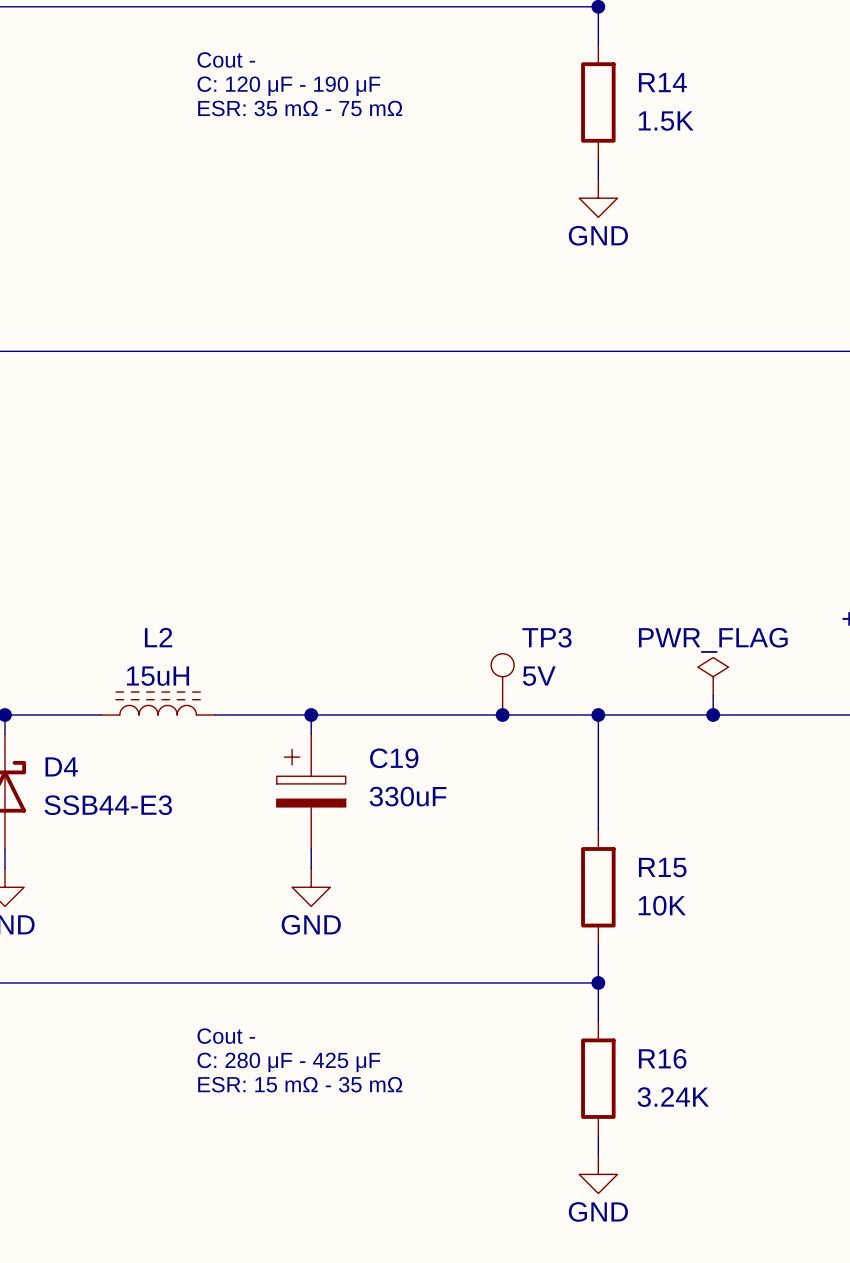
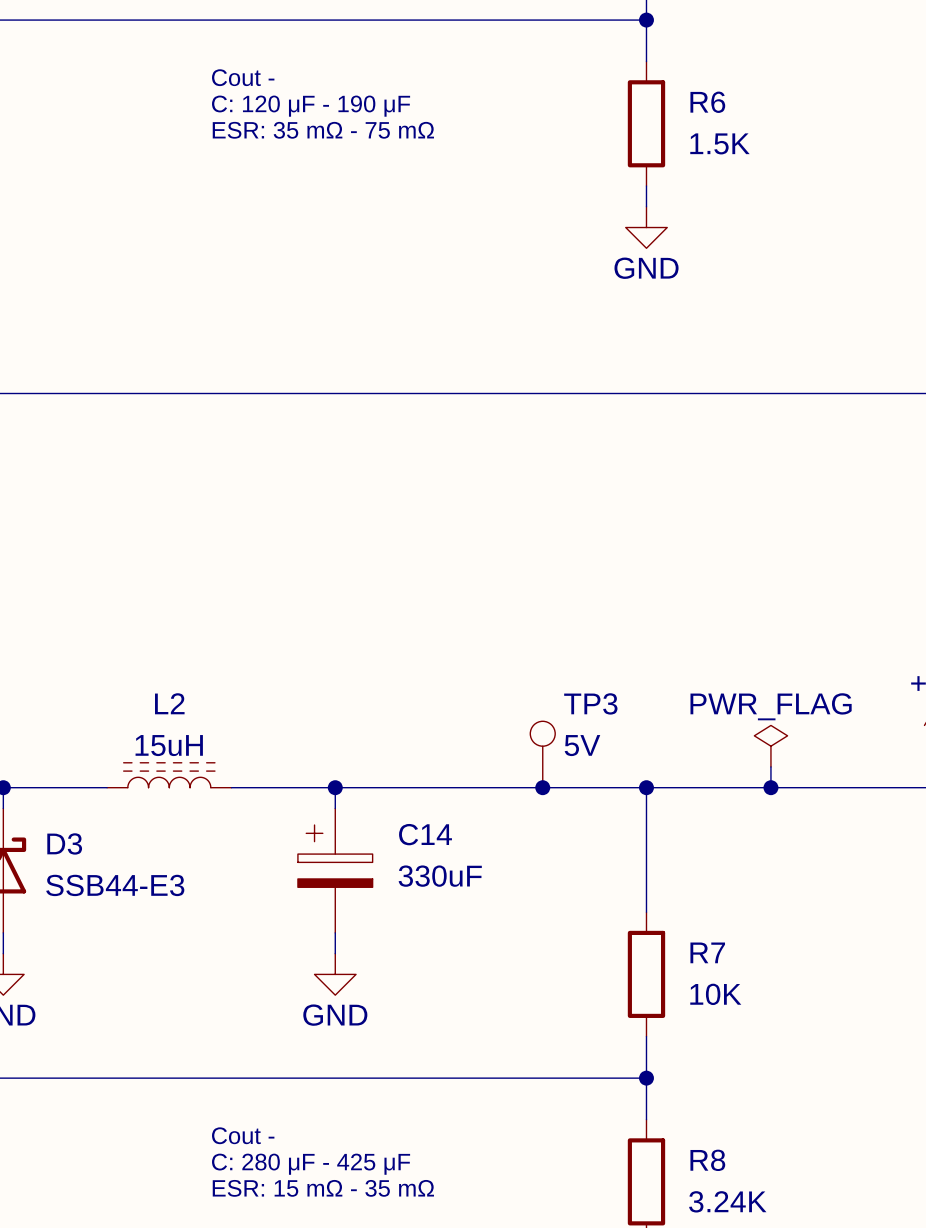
R14 name: R14 (662, 82) -> R6 (707, 102)
C19 name: C19 (394, 758) -> C14 (425, 834)
D4 name: D4 (61, 766) -> D3 (64, 843)
R15 name: R15 (662, 867) -> R7 (707, 952)
R16 name: R16 (662, 1058) -> R8 (707, 1160)

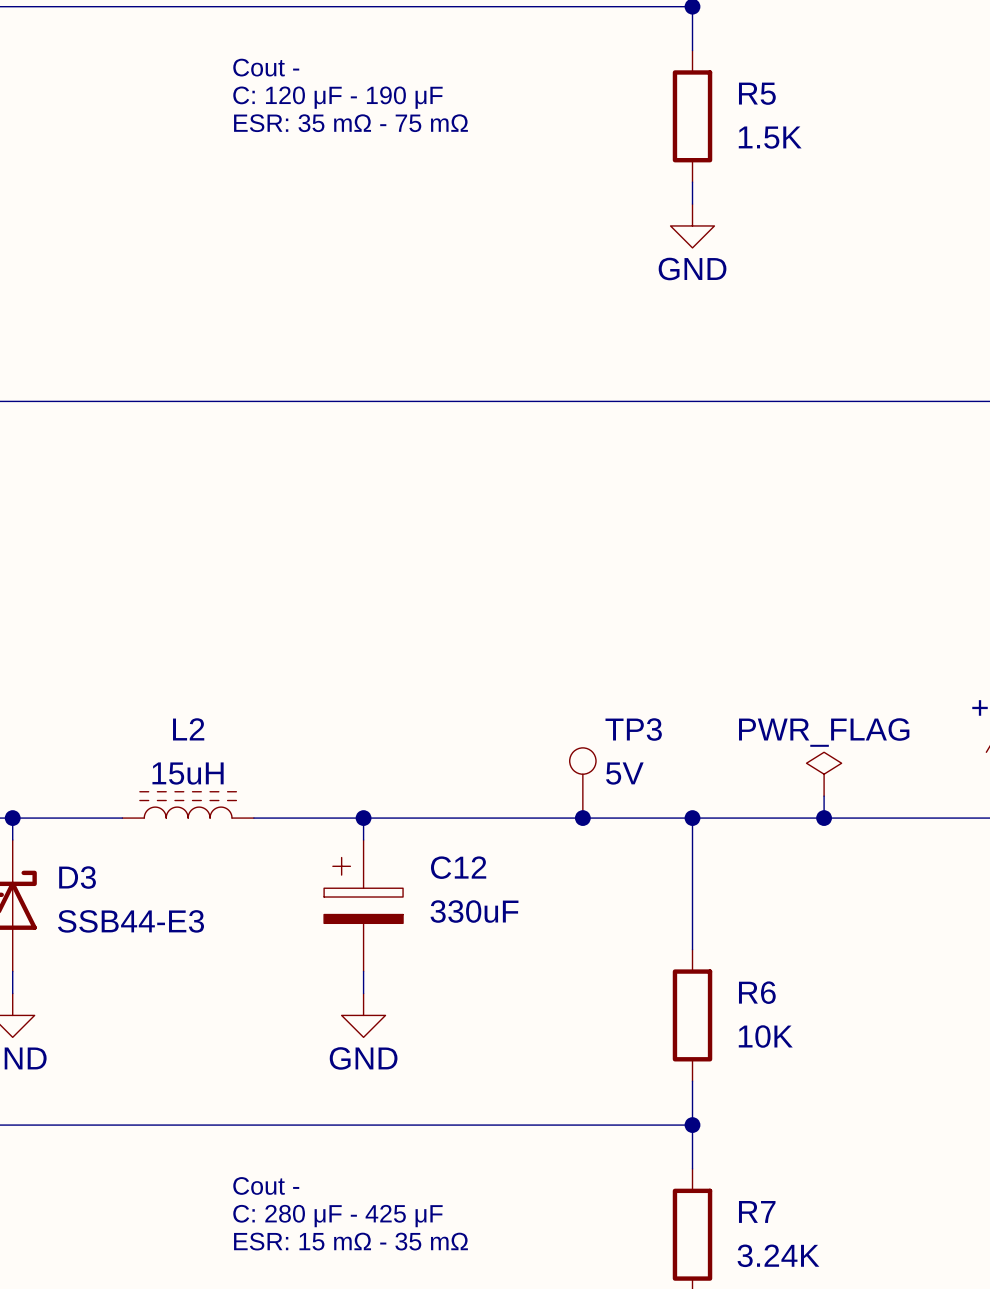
R6 name: R6 (707, 102) -> R5 (757, 93)
C14 name: C14 (425, 834) -> C12 (458, 867)
R7 name: R7 (707, 952) -> R6 (757, 992)
R8 name: R8 (707, 1160) -> R7 (757, 1211)

